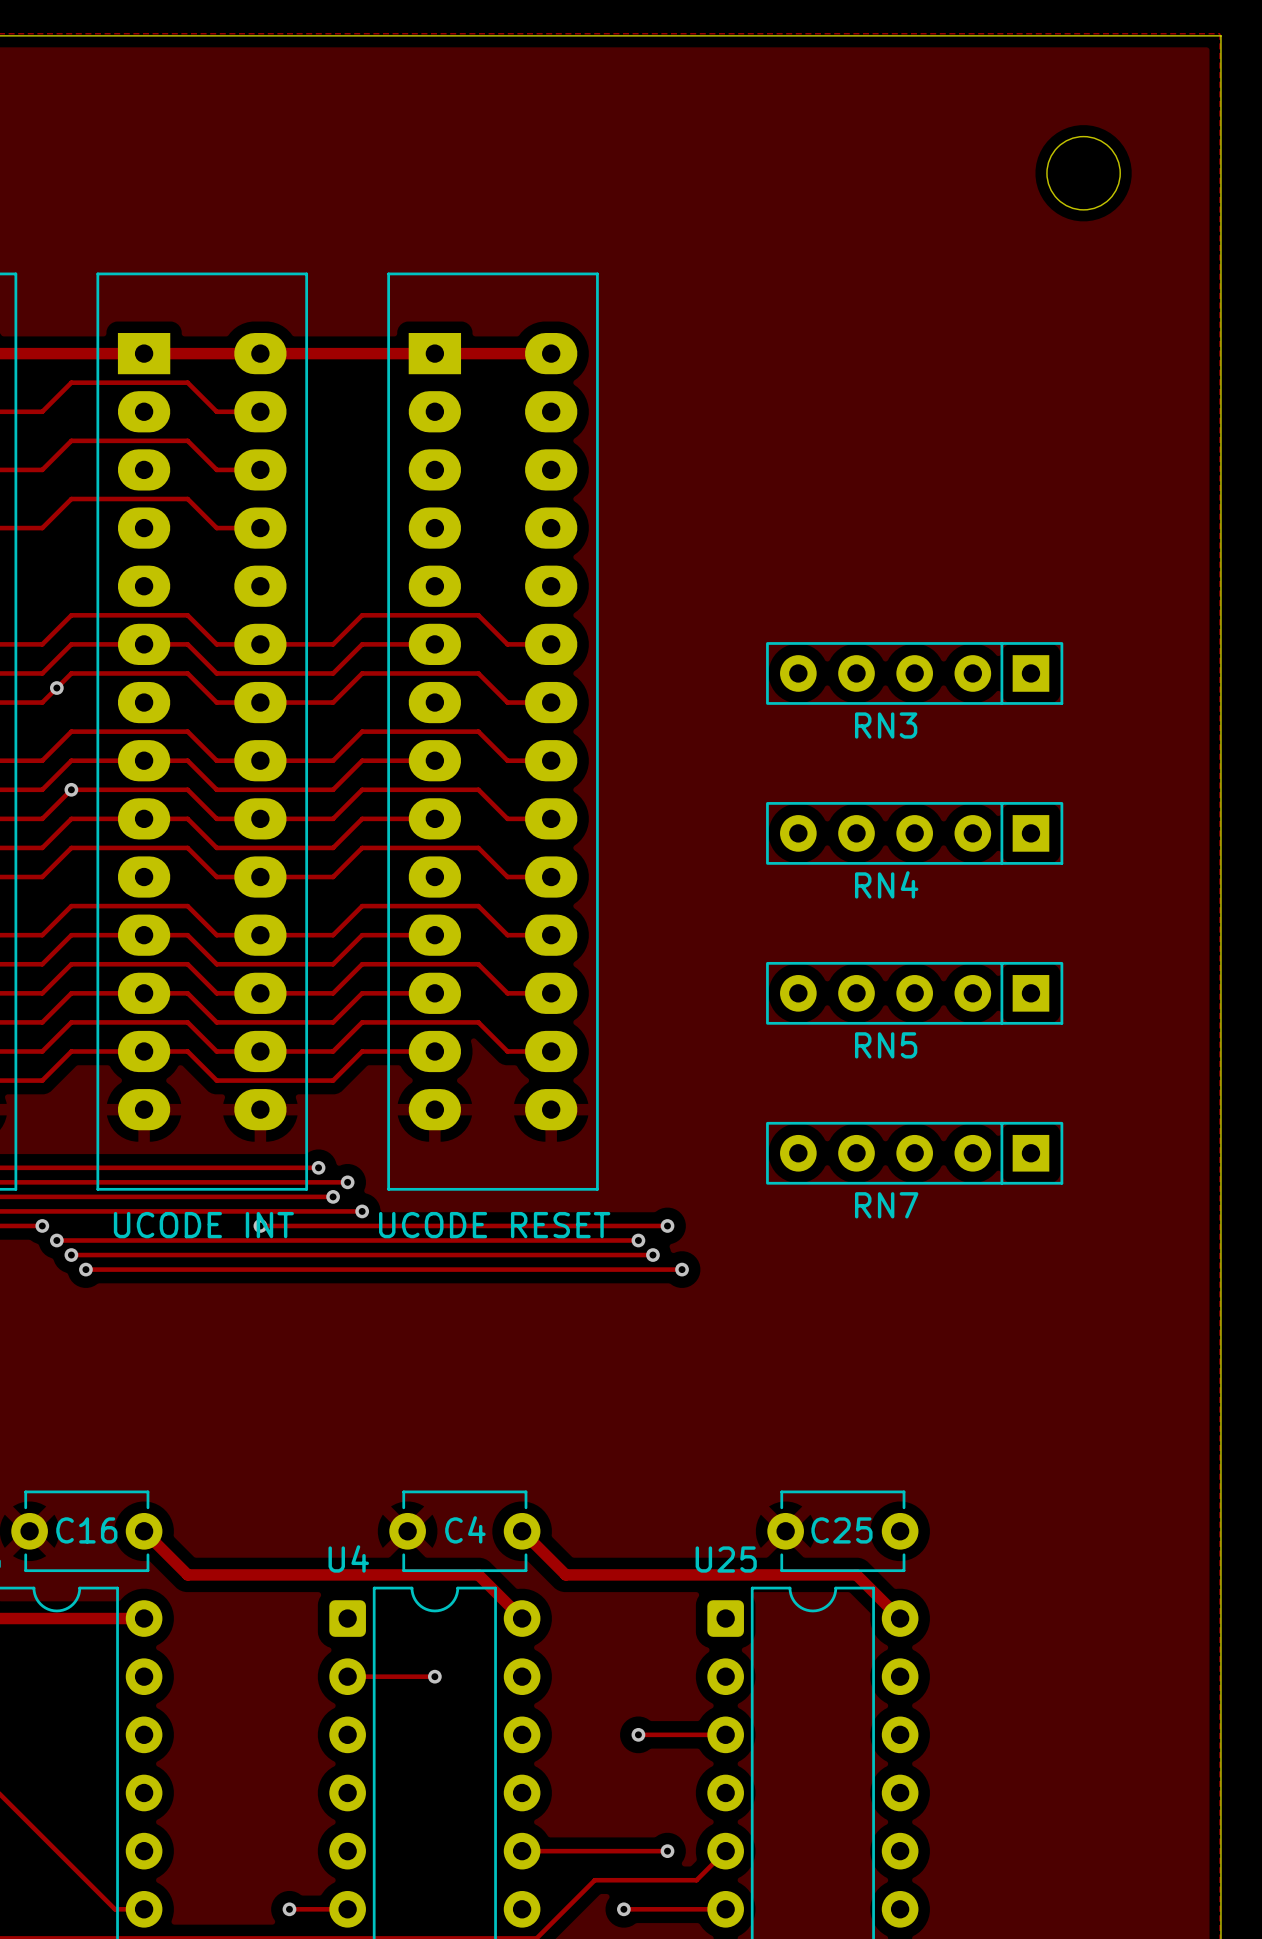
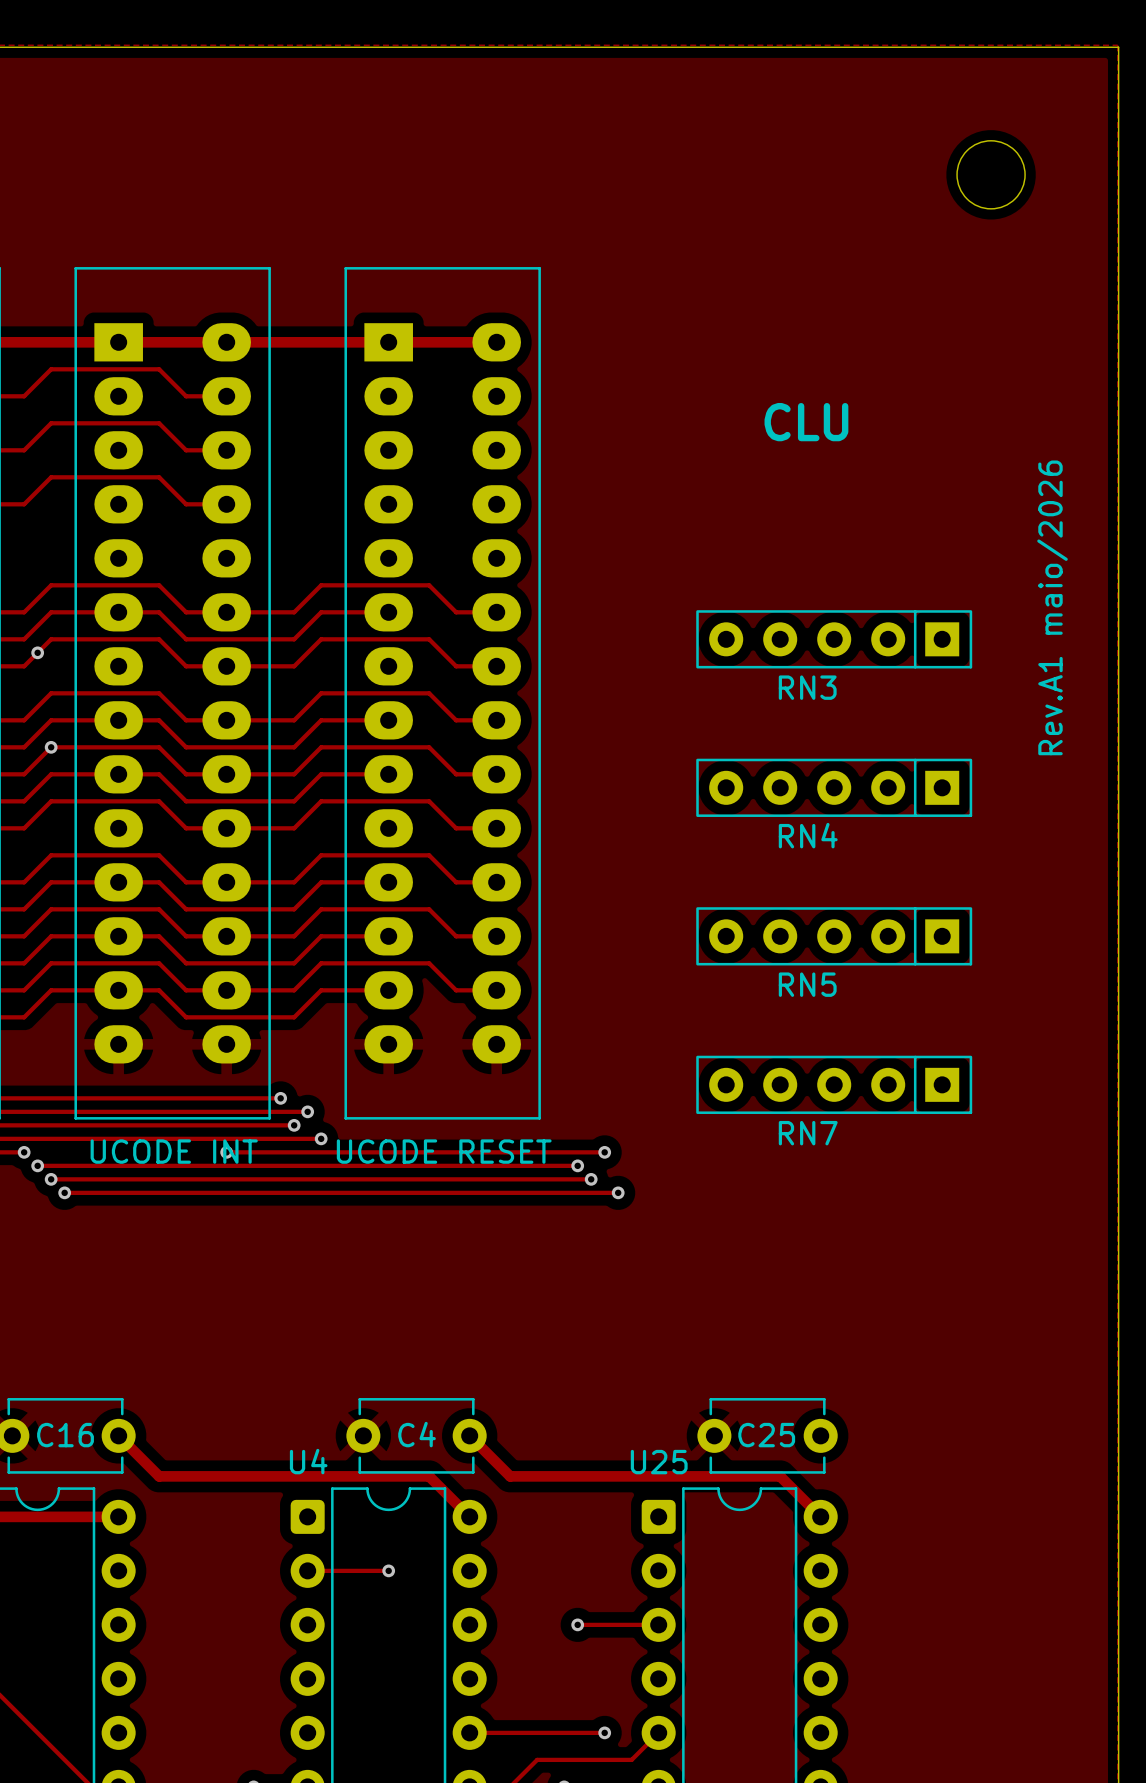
text: none -> CLU (806, 422)
text: none -> Rev.A1 maio/2026 (1052, 607)

